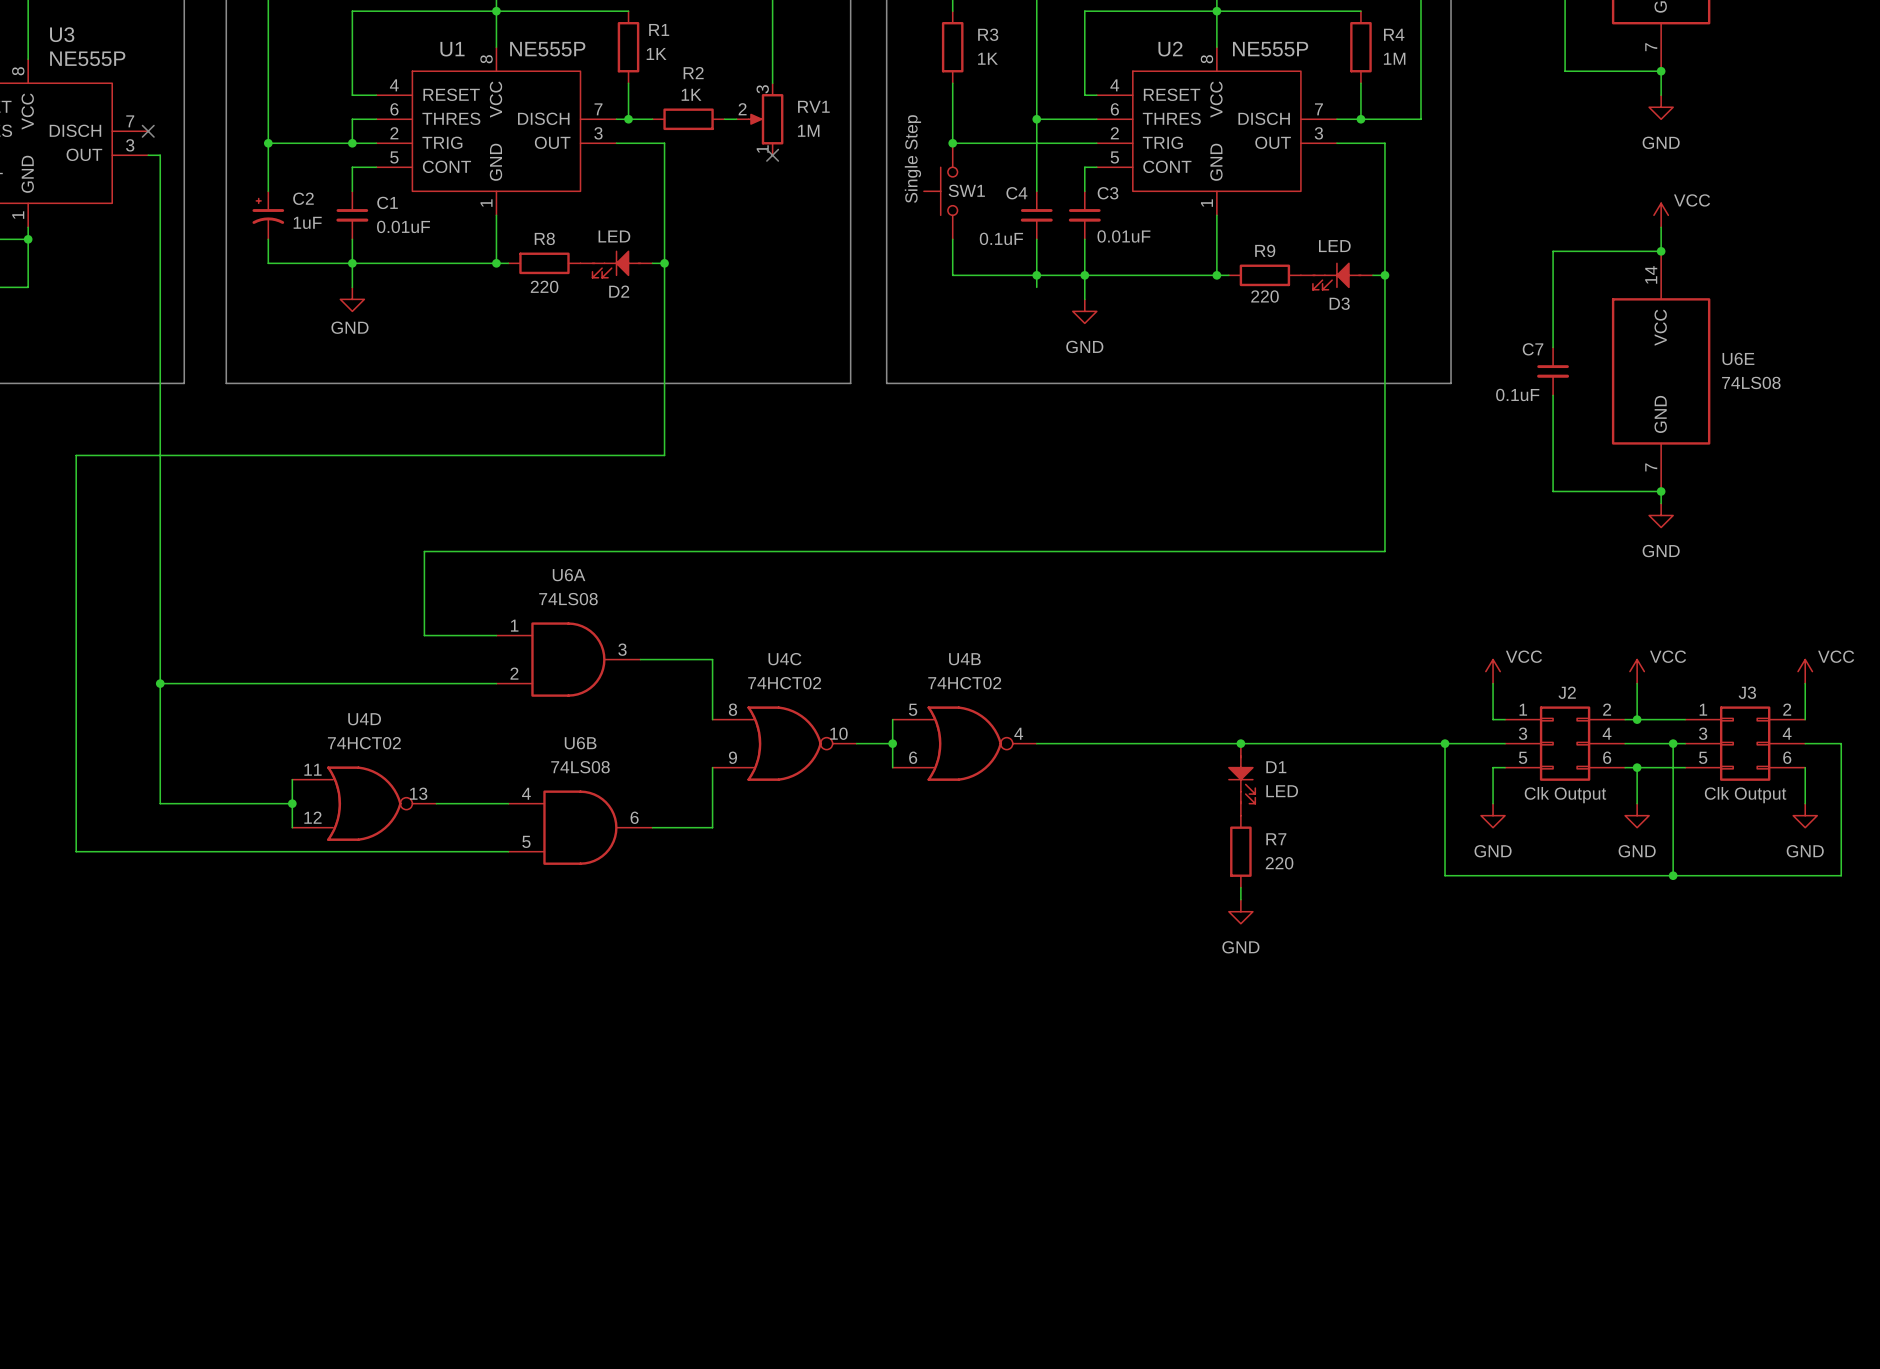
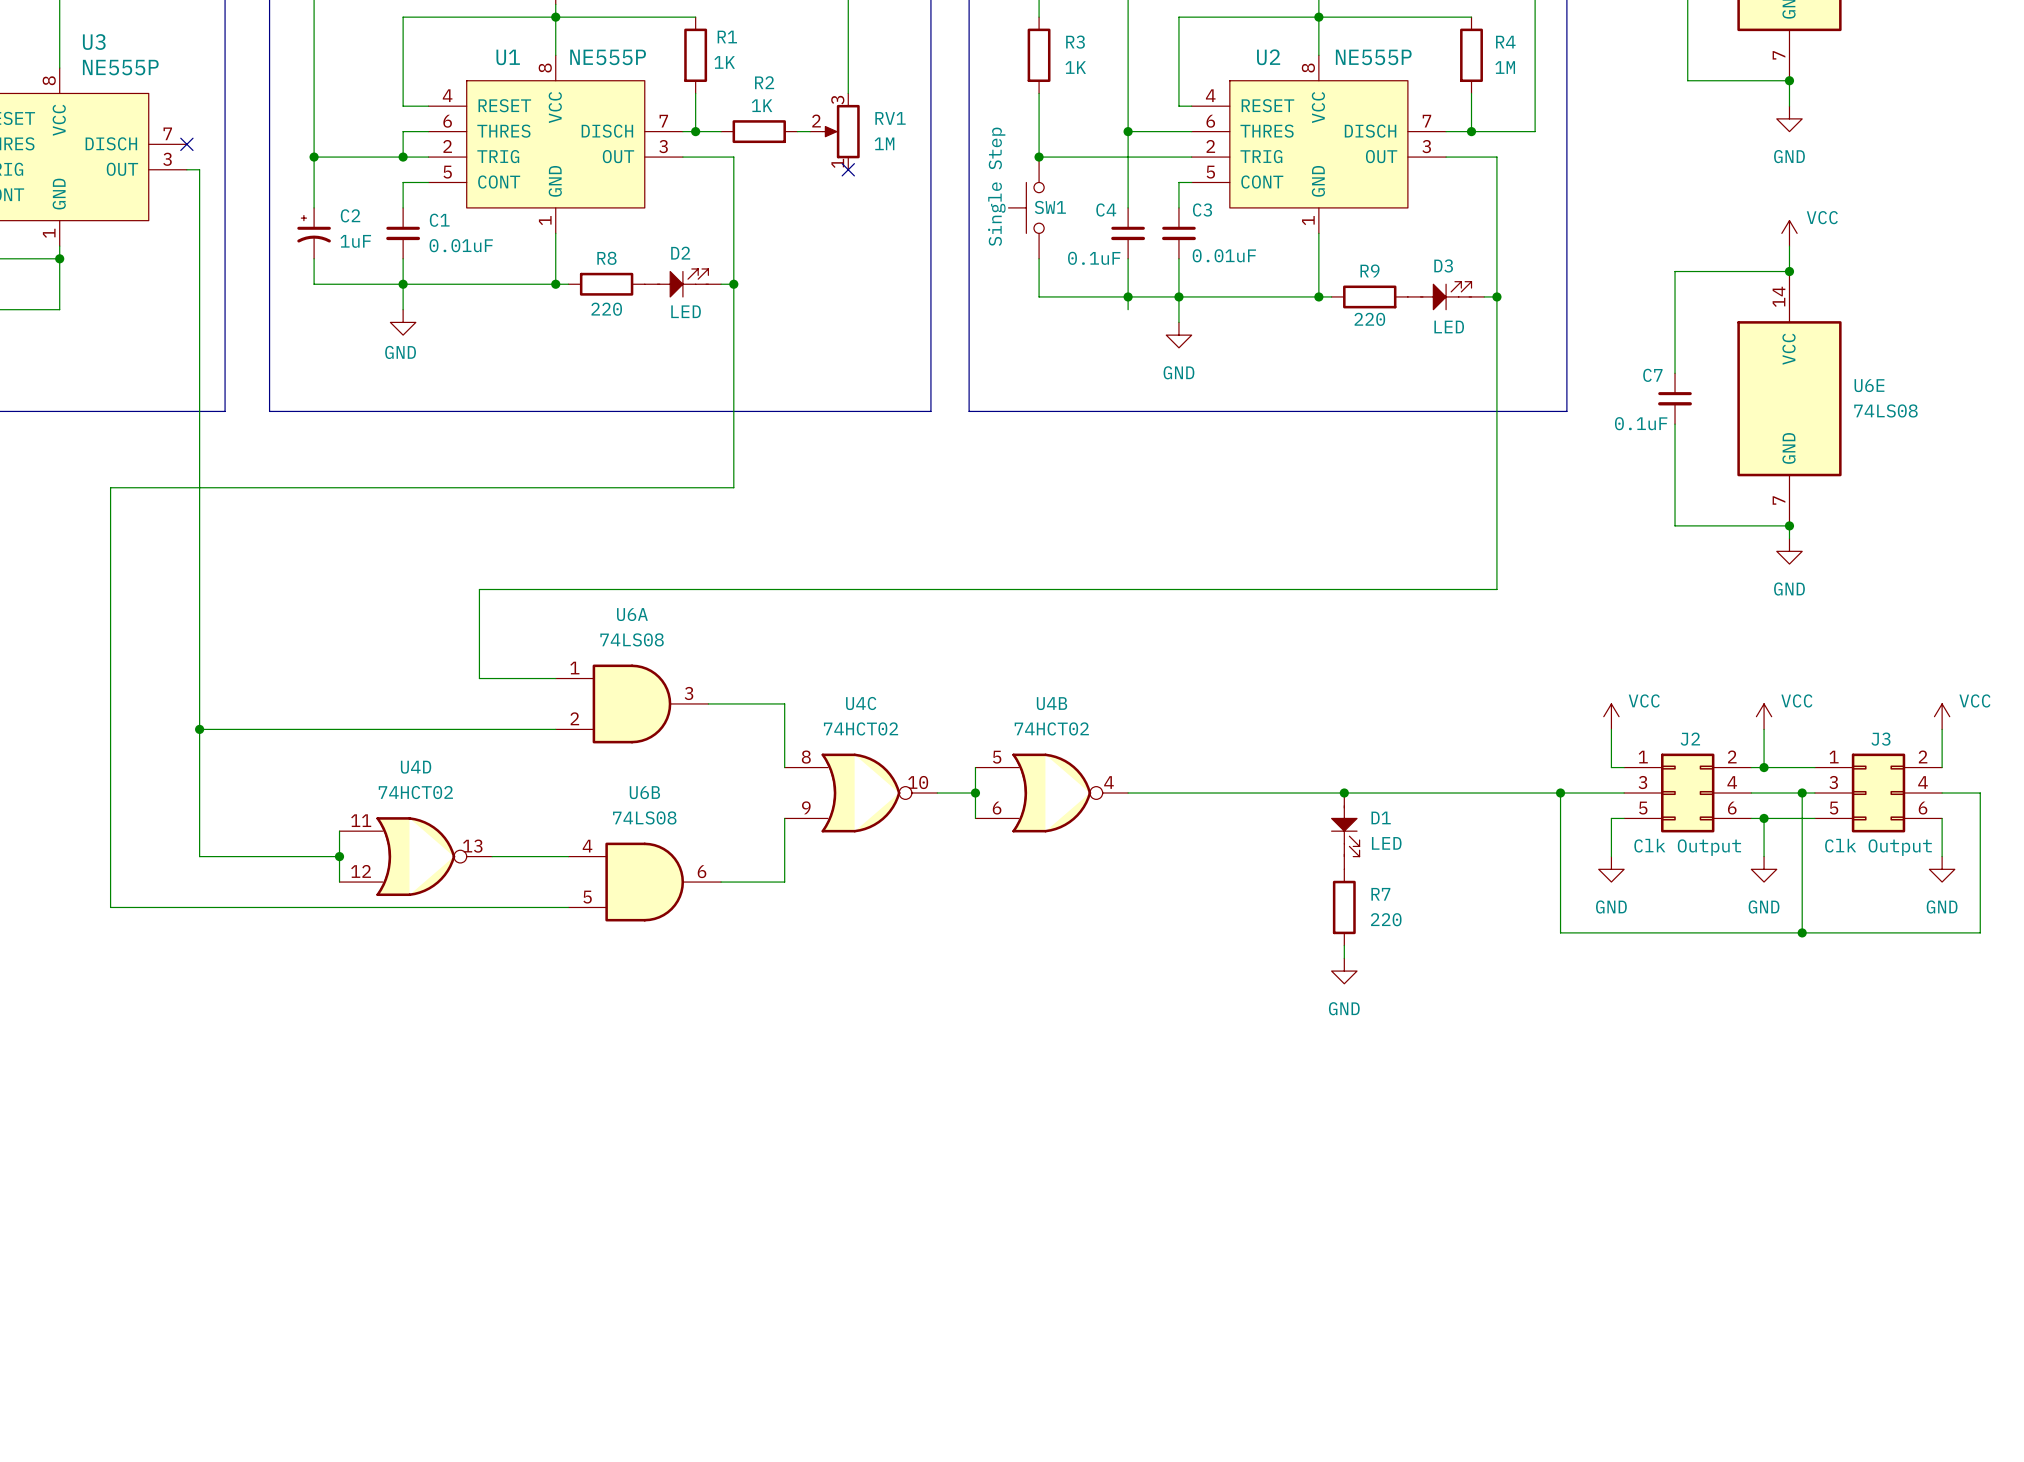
D2 rotation: 0° (616, 264) -> 180° (682, 282)
D3 rotation: 0° (1336, 276) -> 180° (1446, 295)

